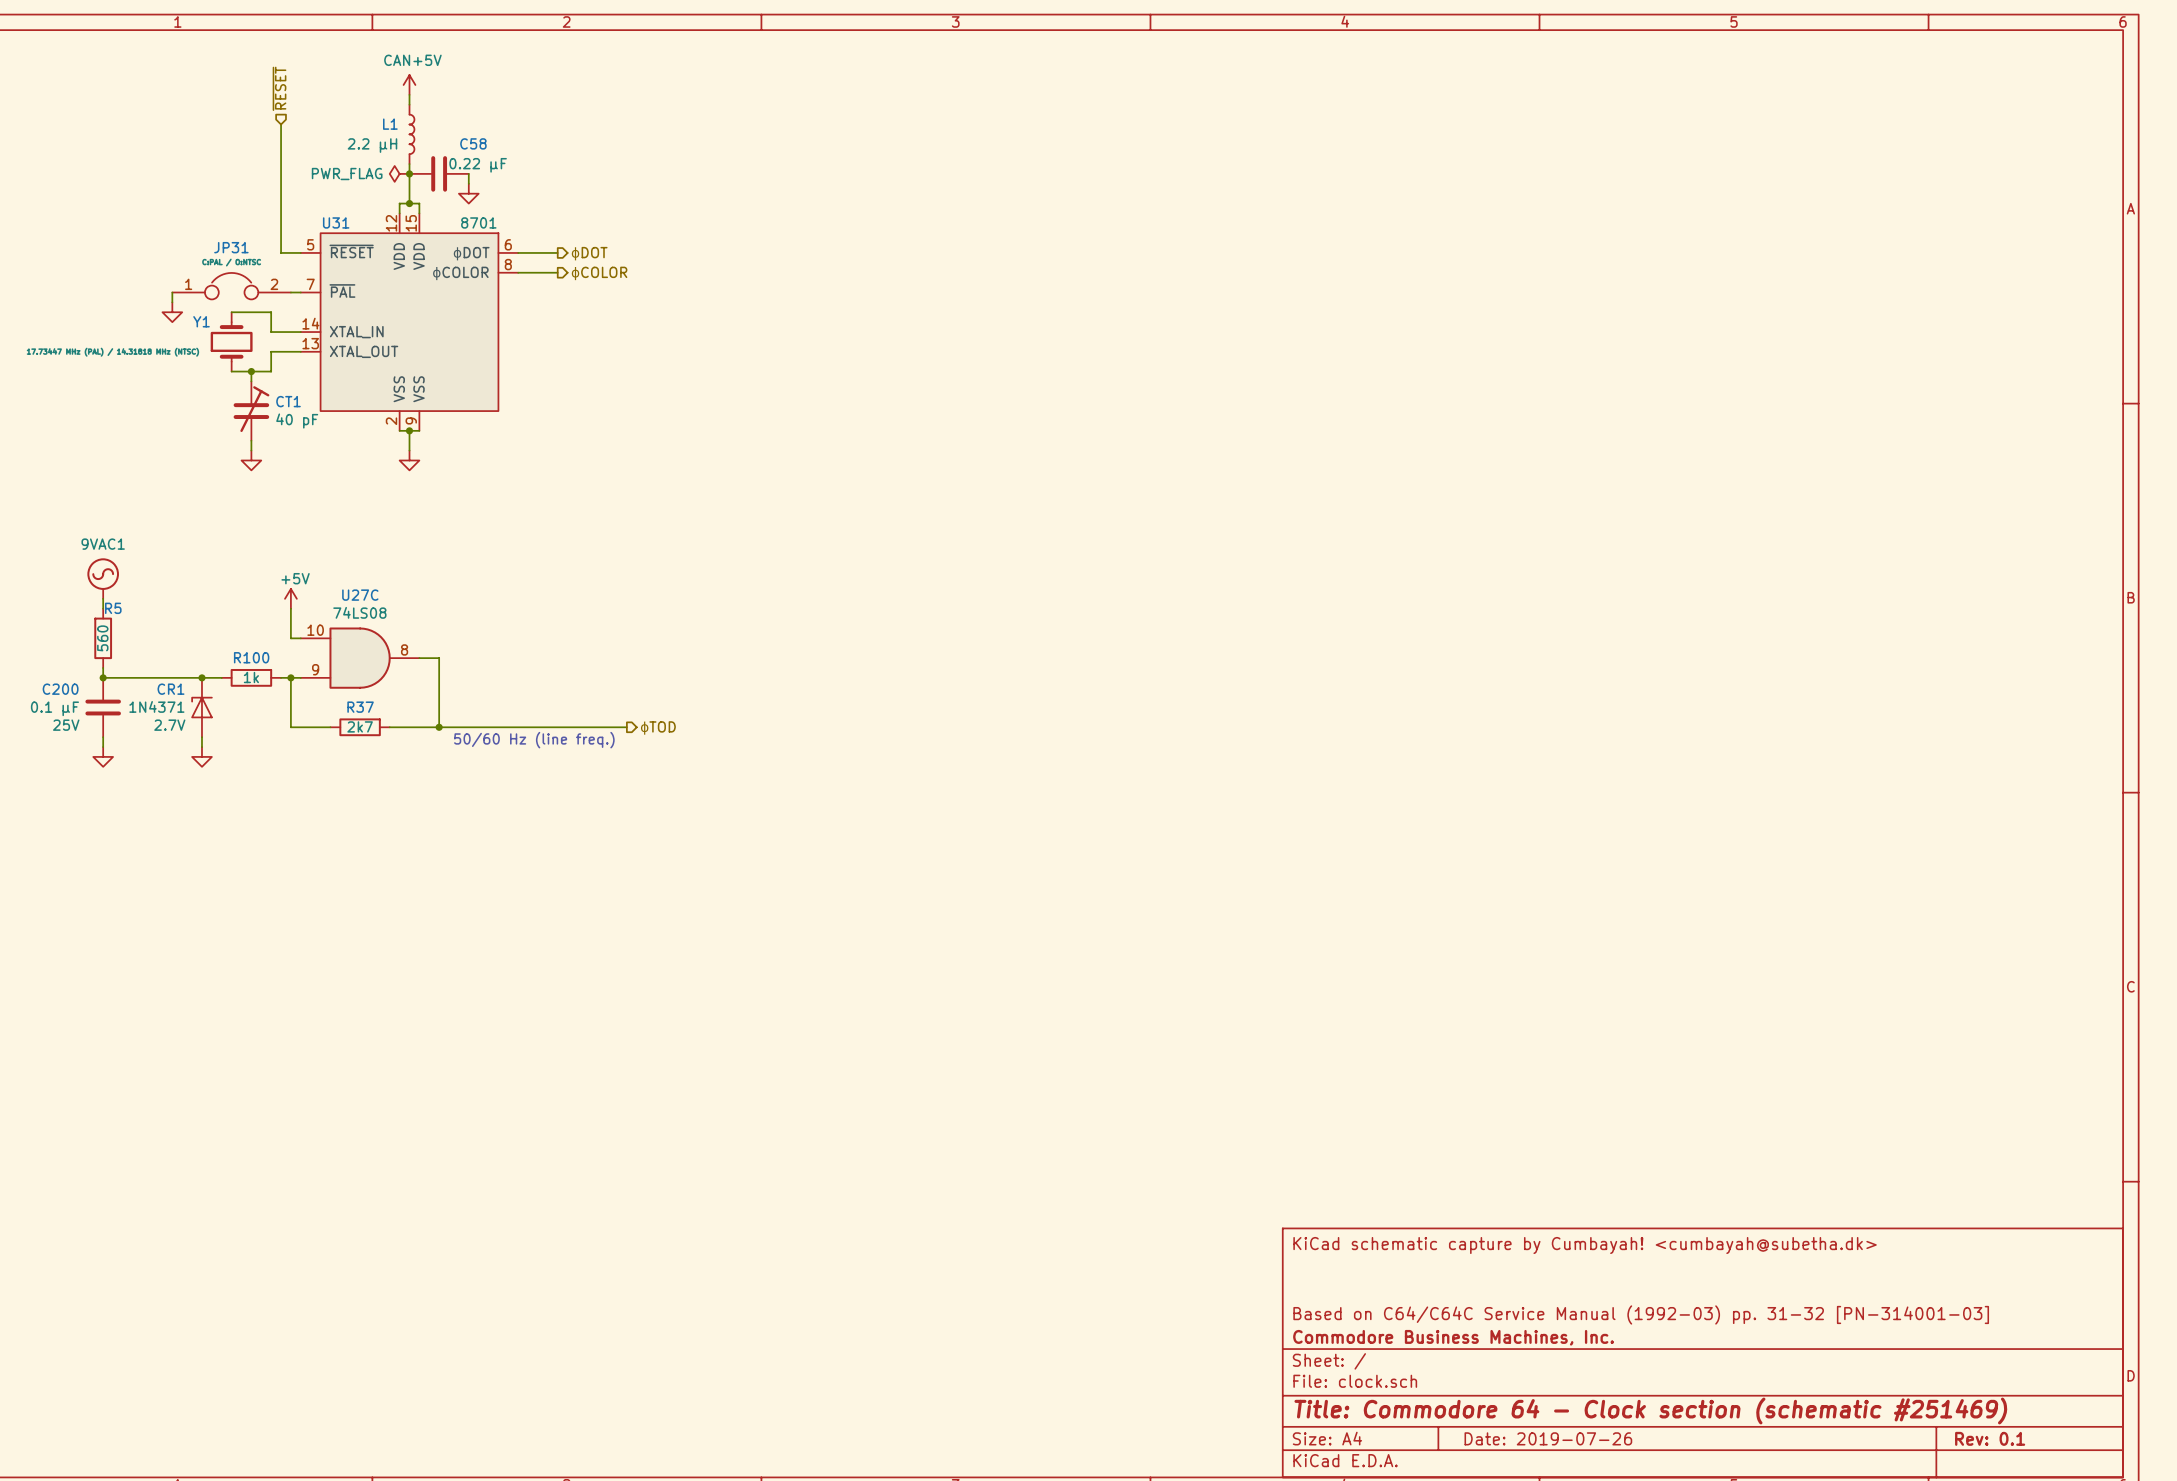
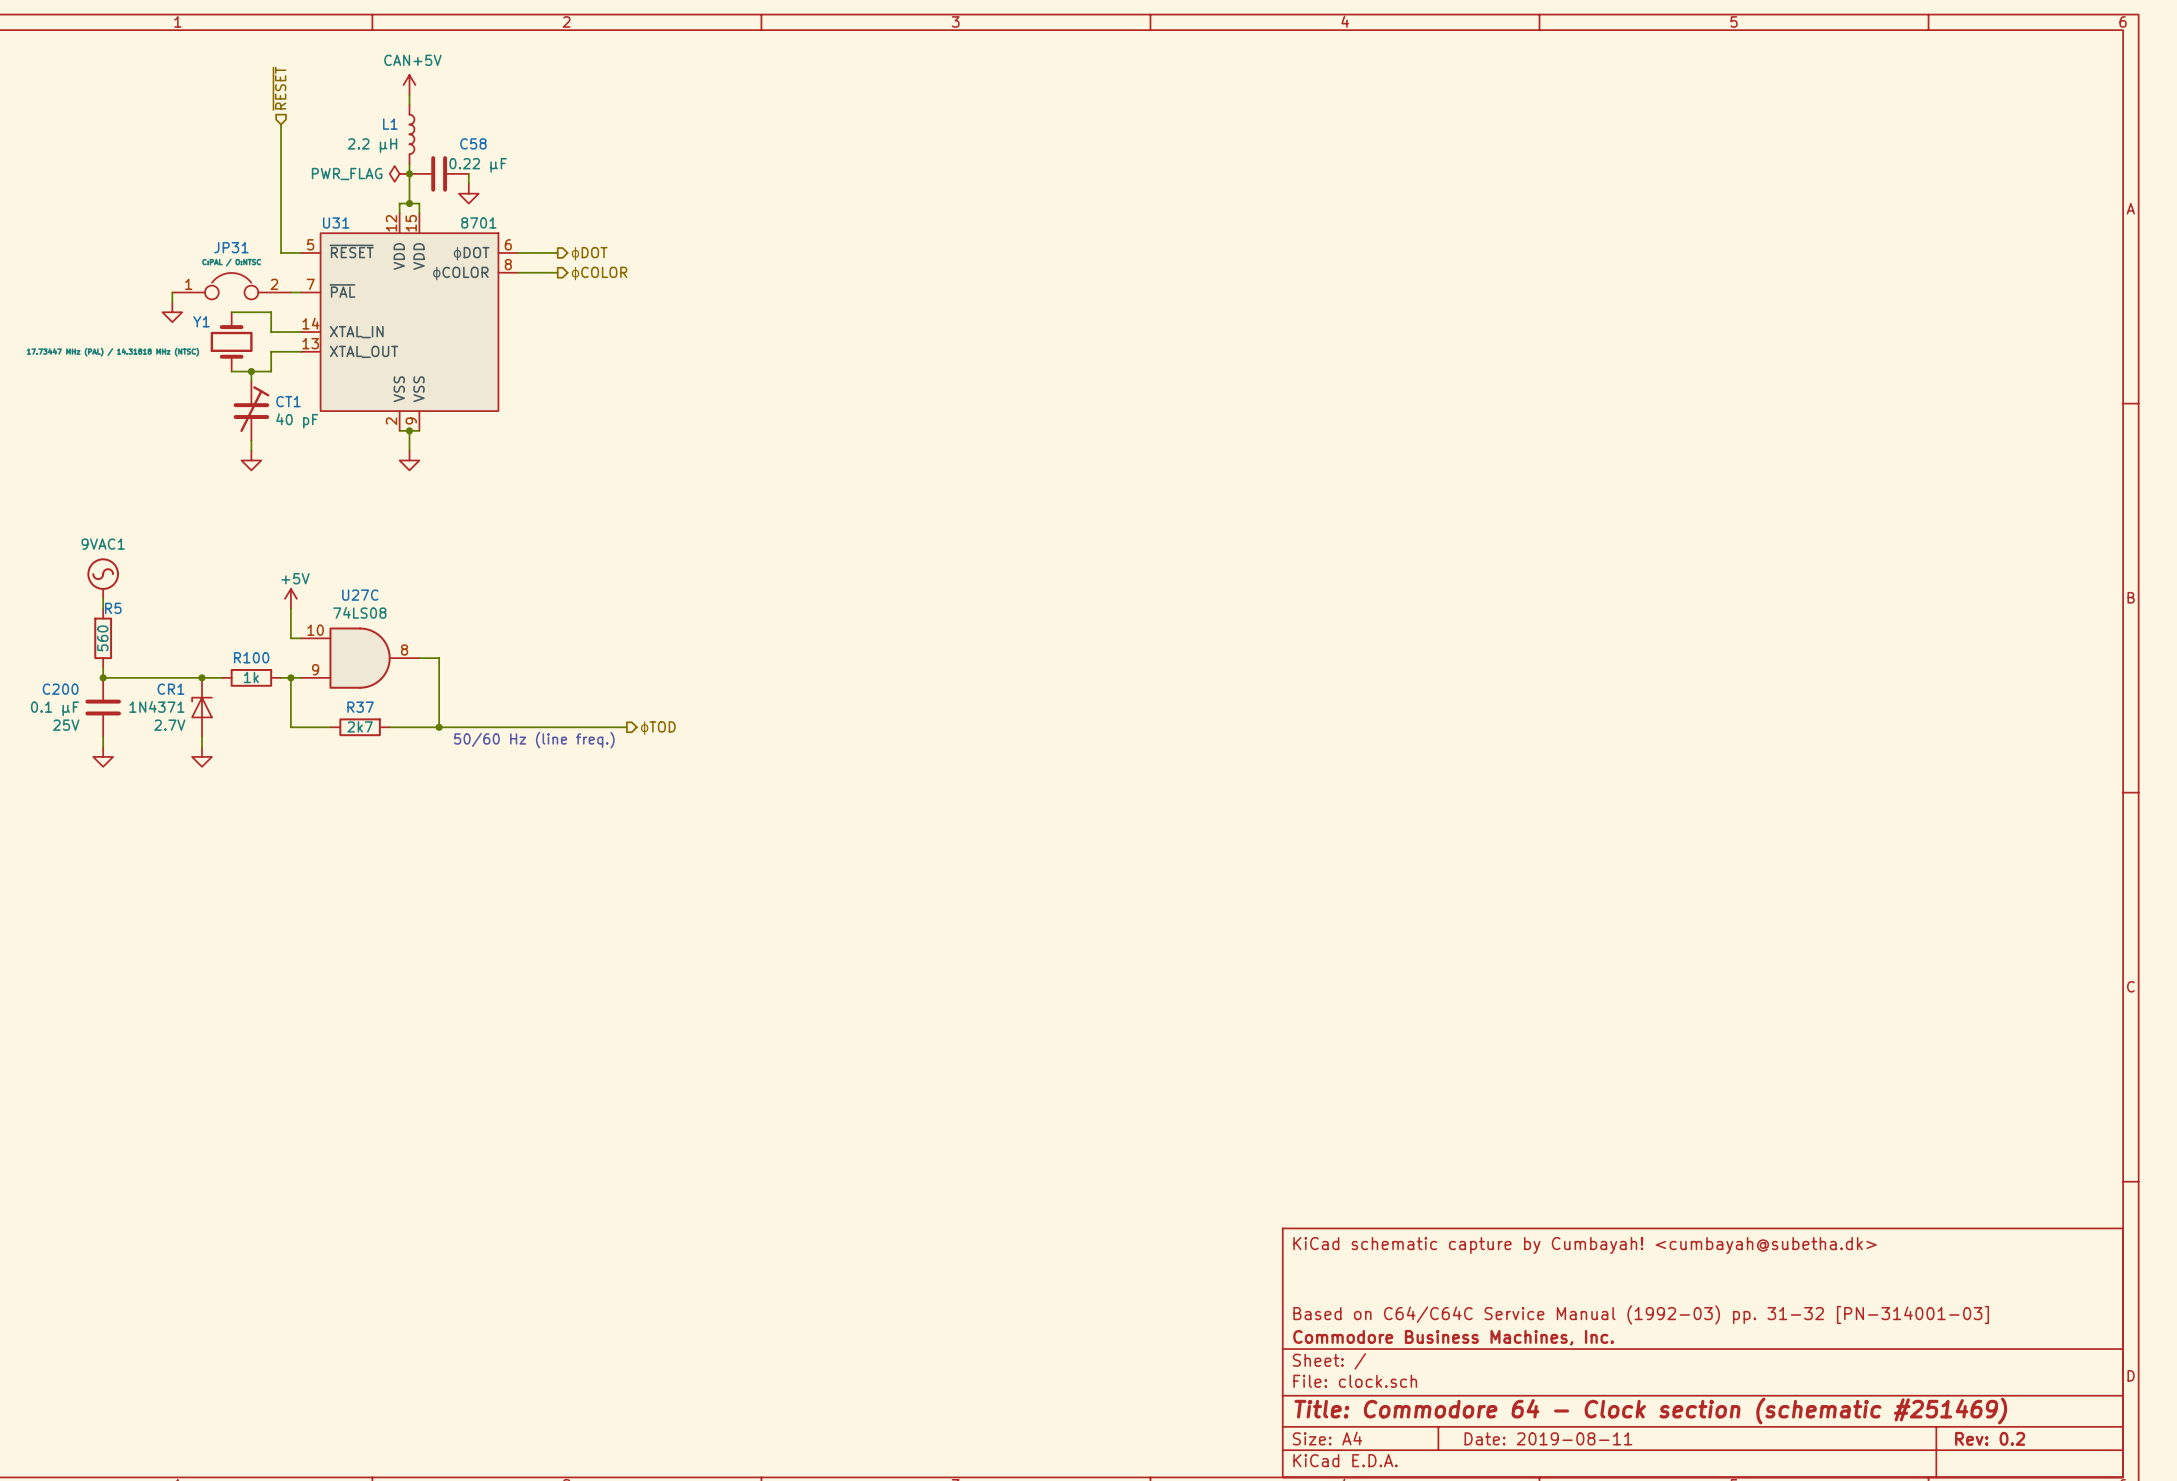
title block: Date: 2019-07-26 (1548, 1438) -> Date: 2019-08-11 (1548, 1438)
title block: Rev: 0.1 (1990, 1438) -> Rev: 0.2 (1990, 1438)

